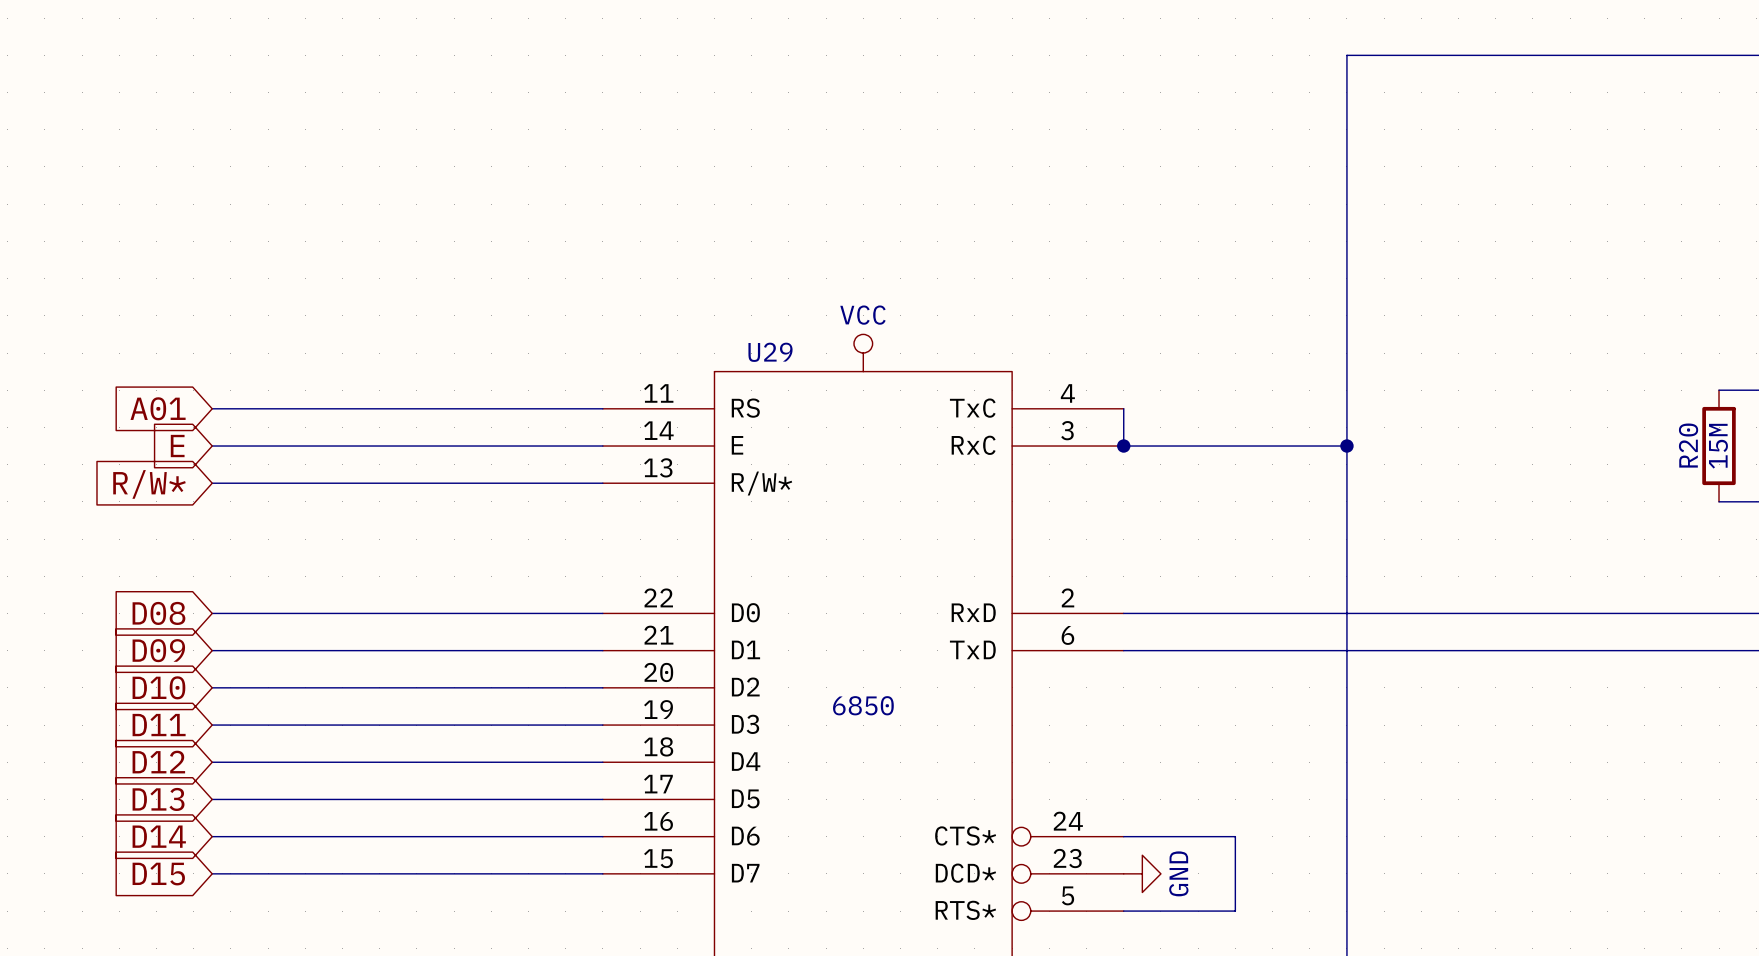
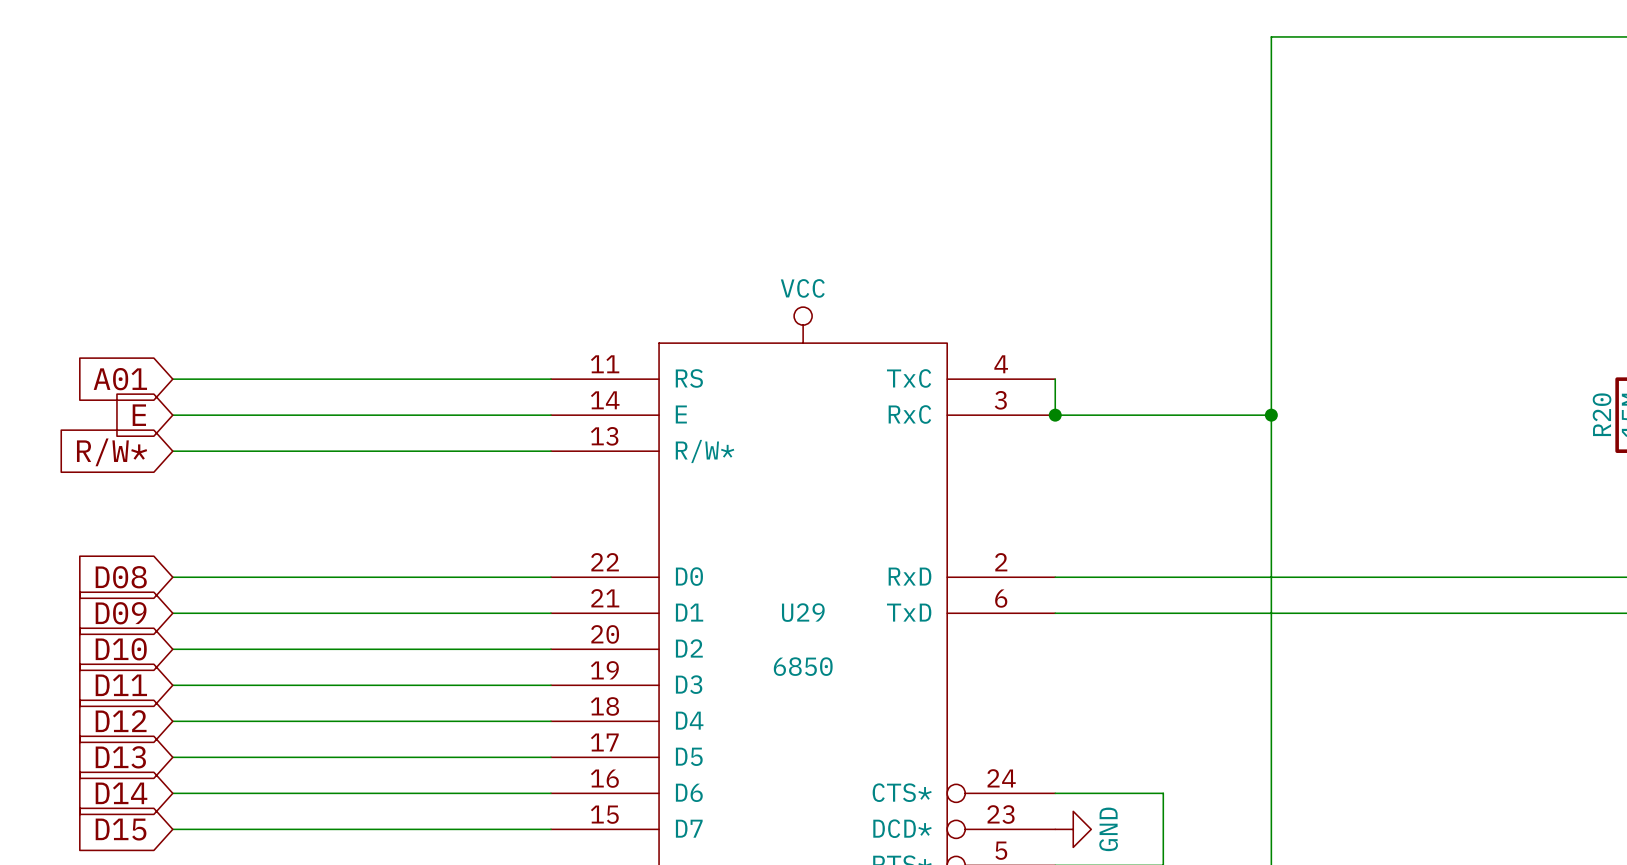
U29 name position: U29 (770, 352) -> U29 (803, 612)

